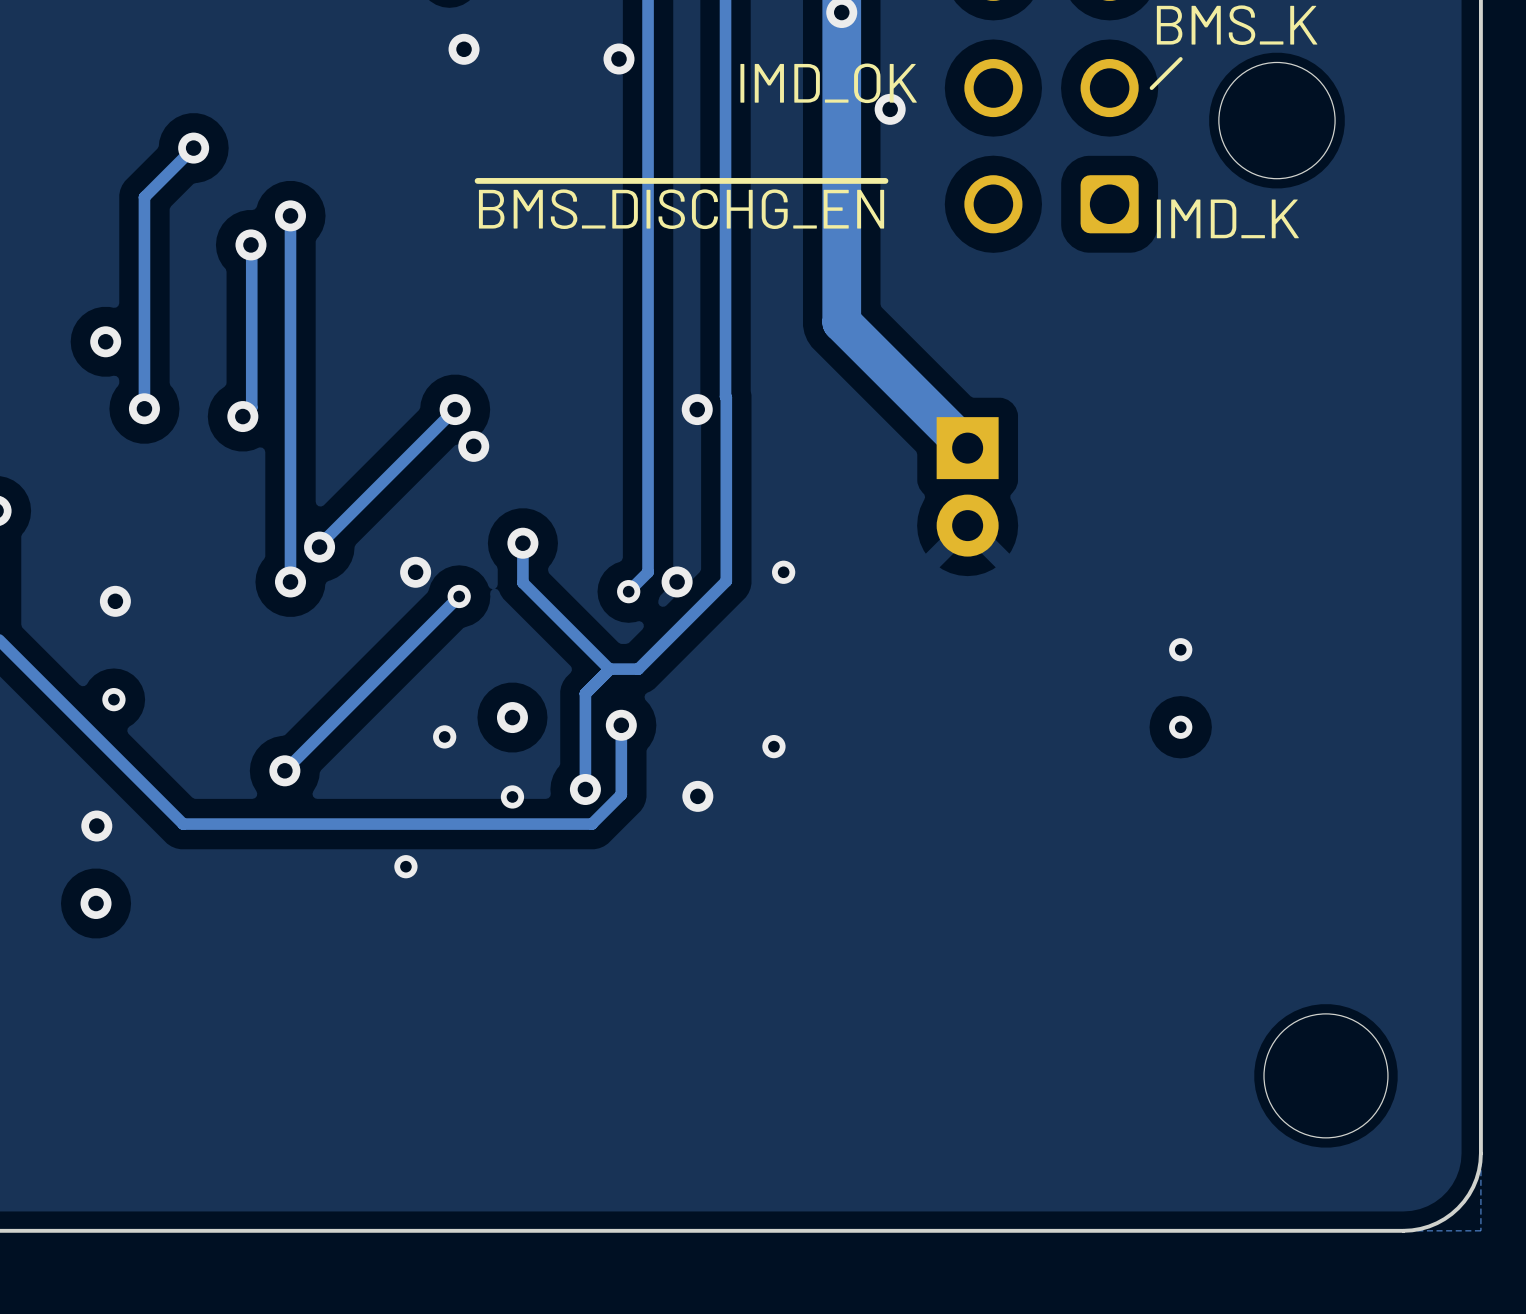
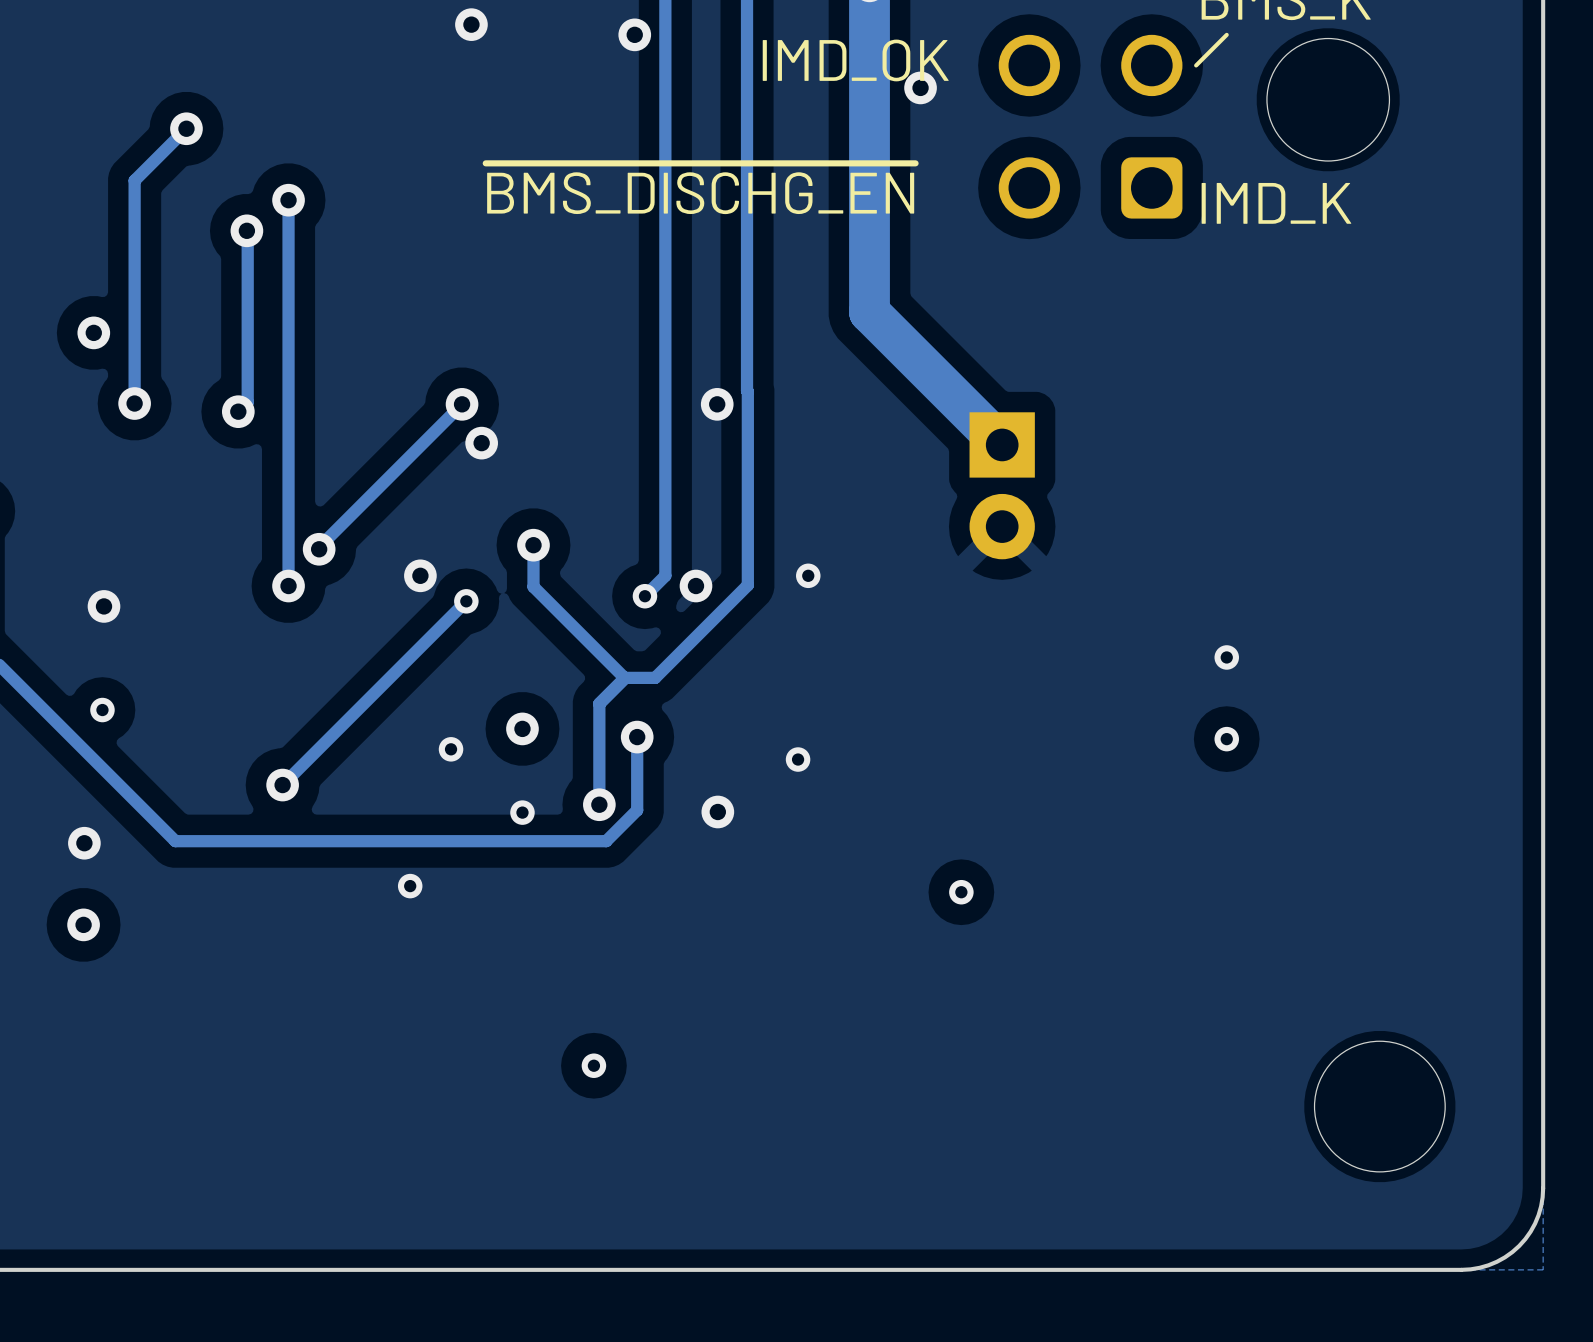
via: none -> (961, 892)
via: none -> (593, 1065)

